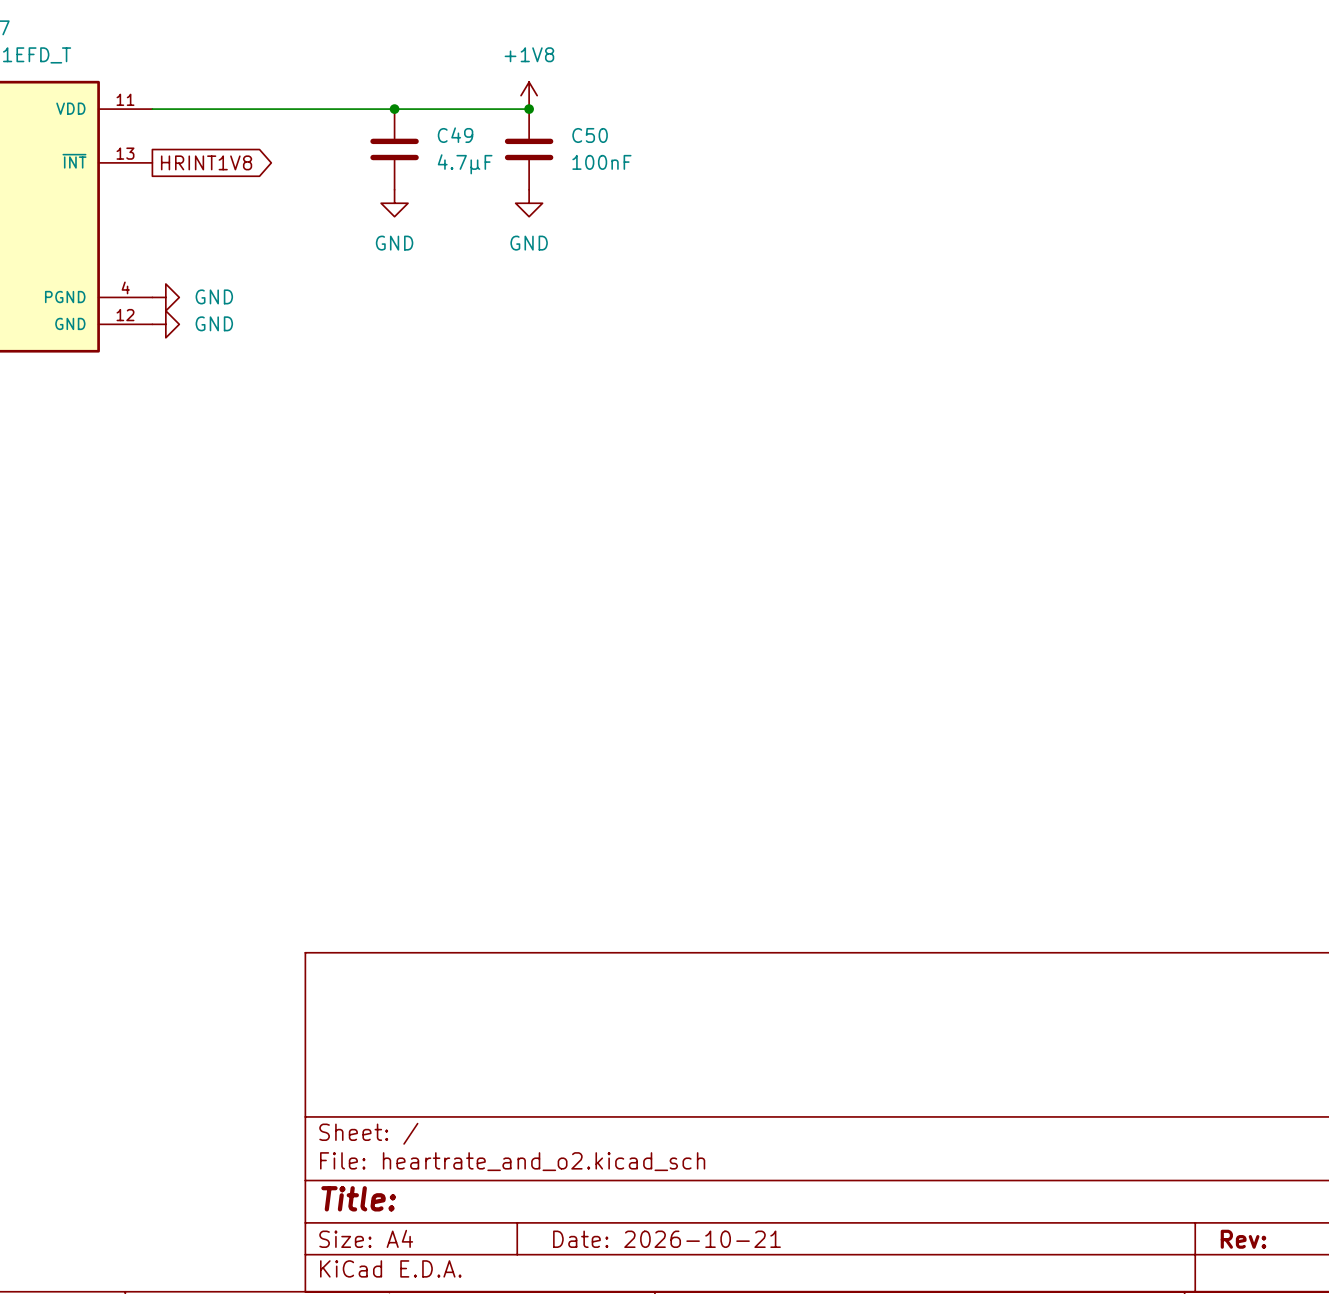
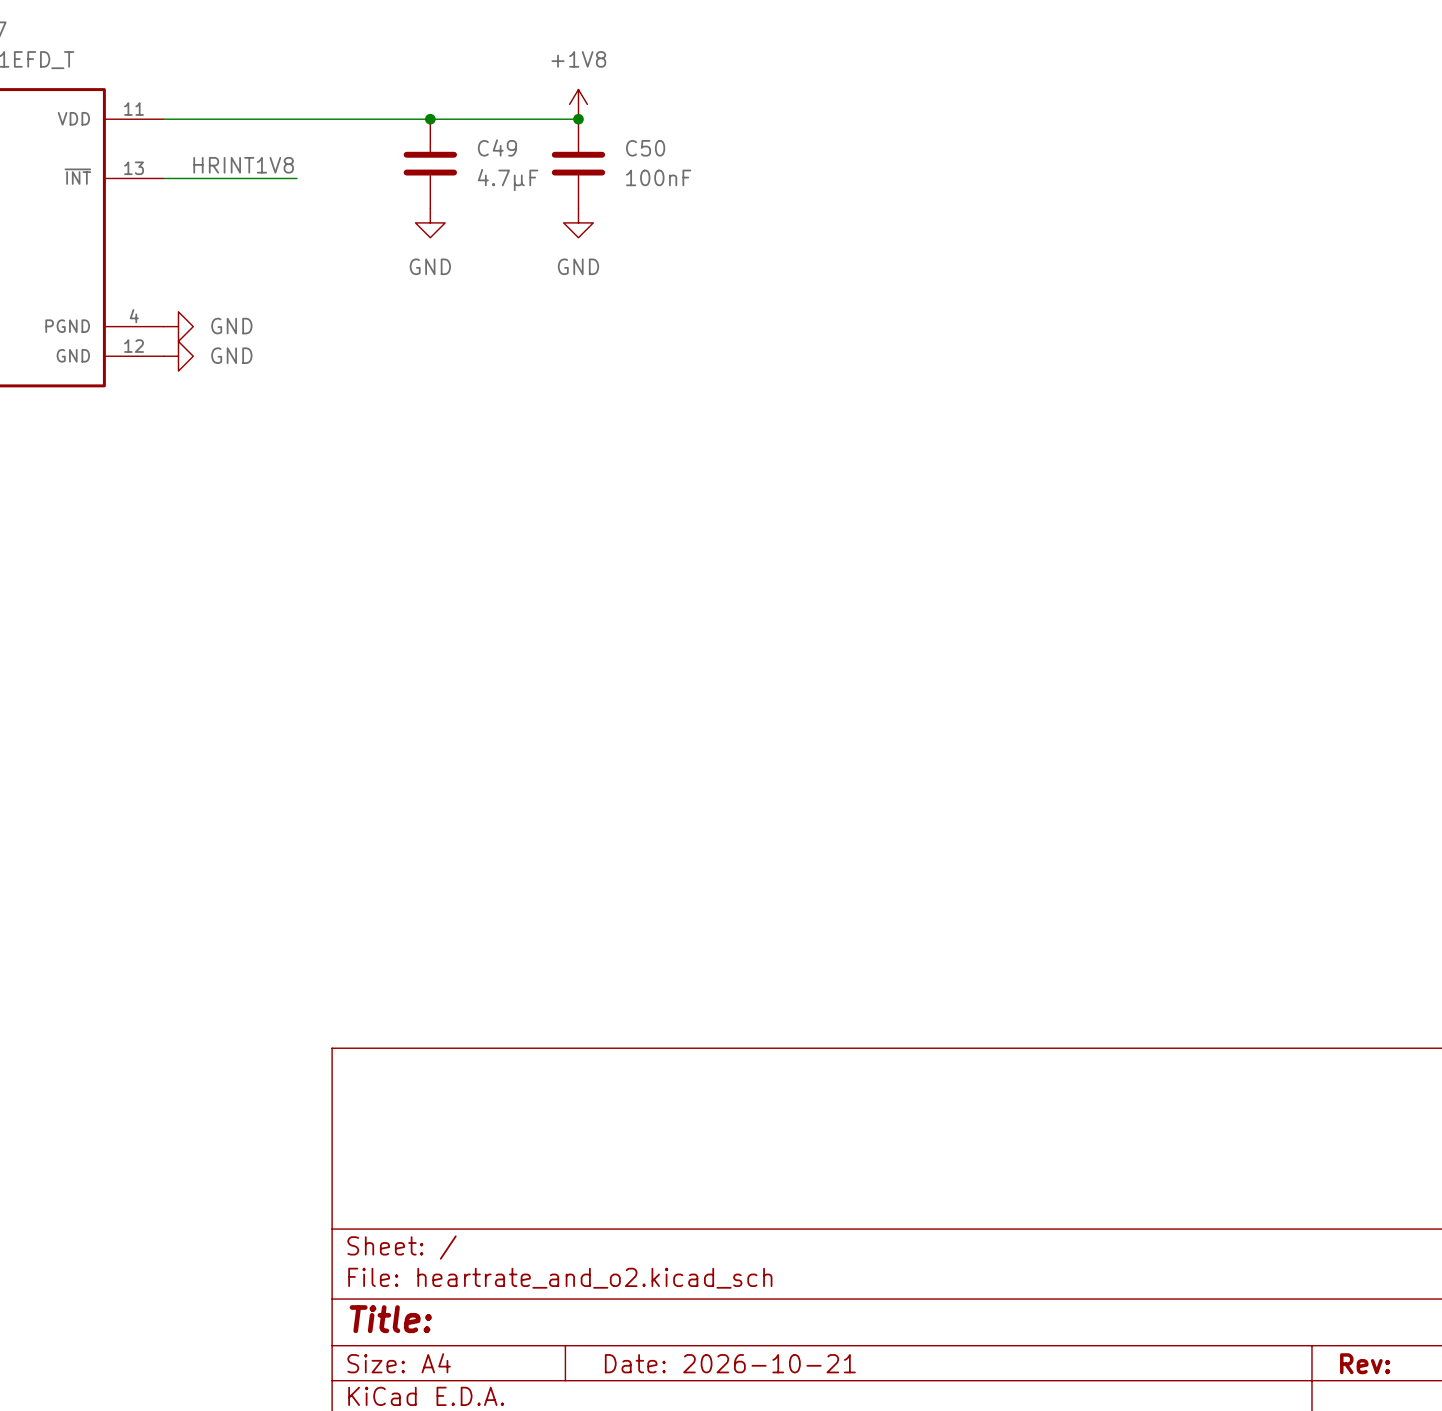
label: none -> HRINT1V8 (243, 165)
wire: none -> (163, 178) (296, 178)
global label: HRINT1V8 (206, 162) -> none

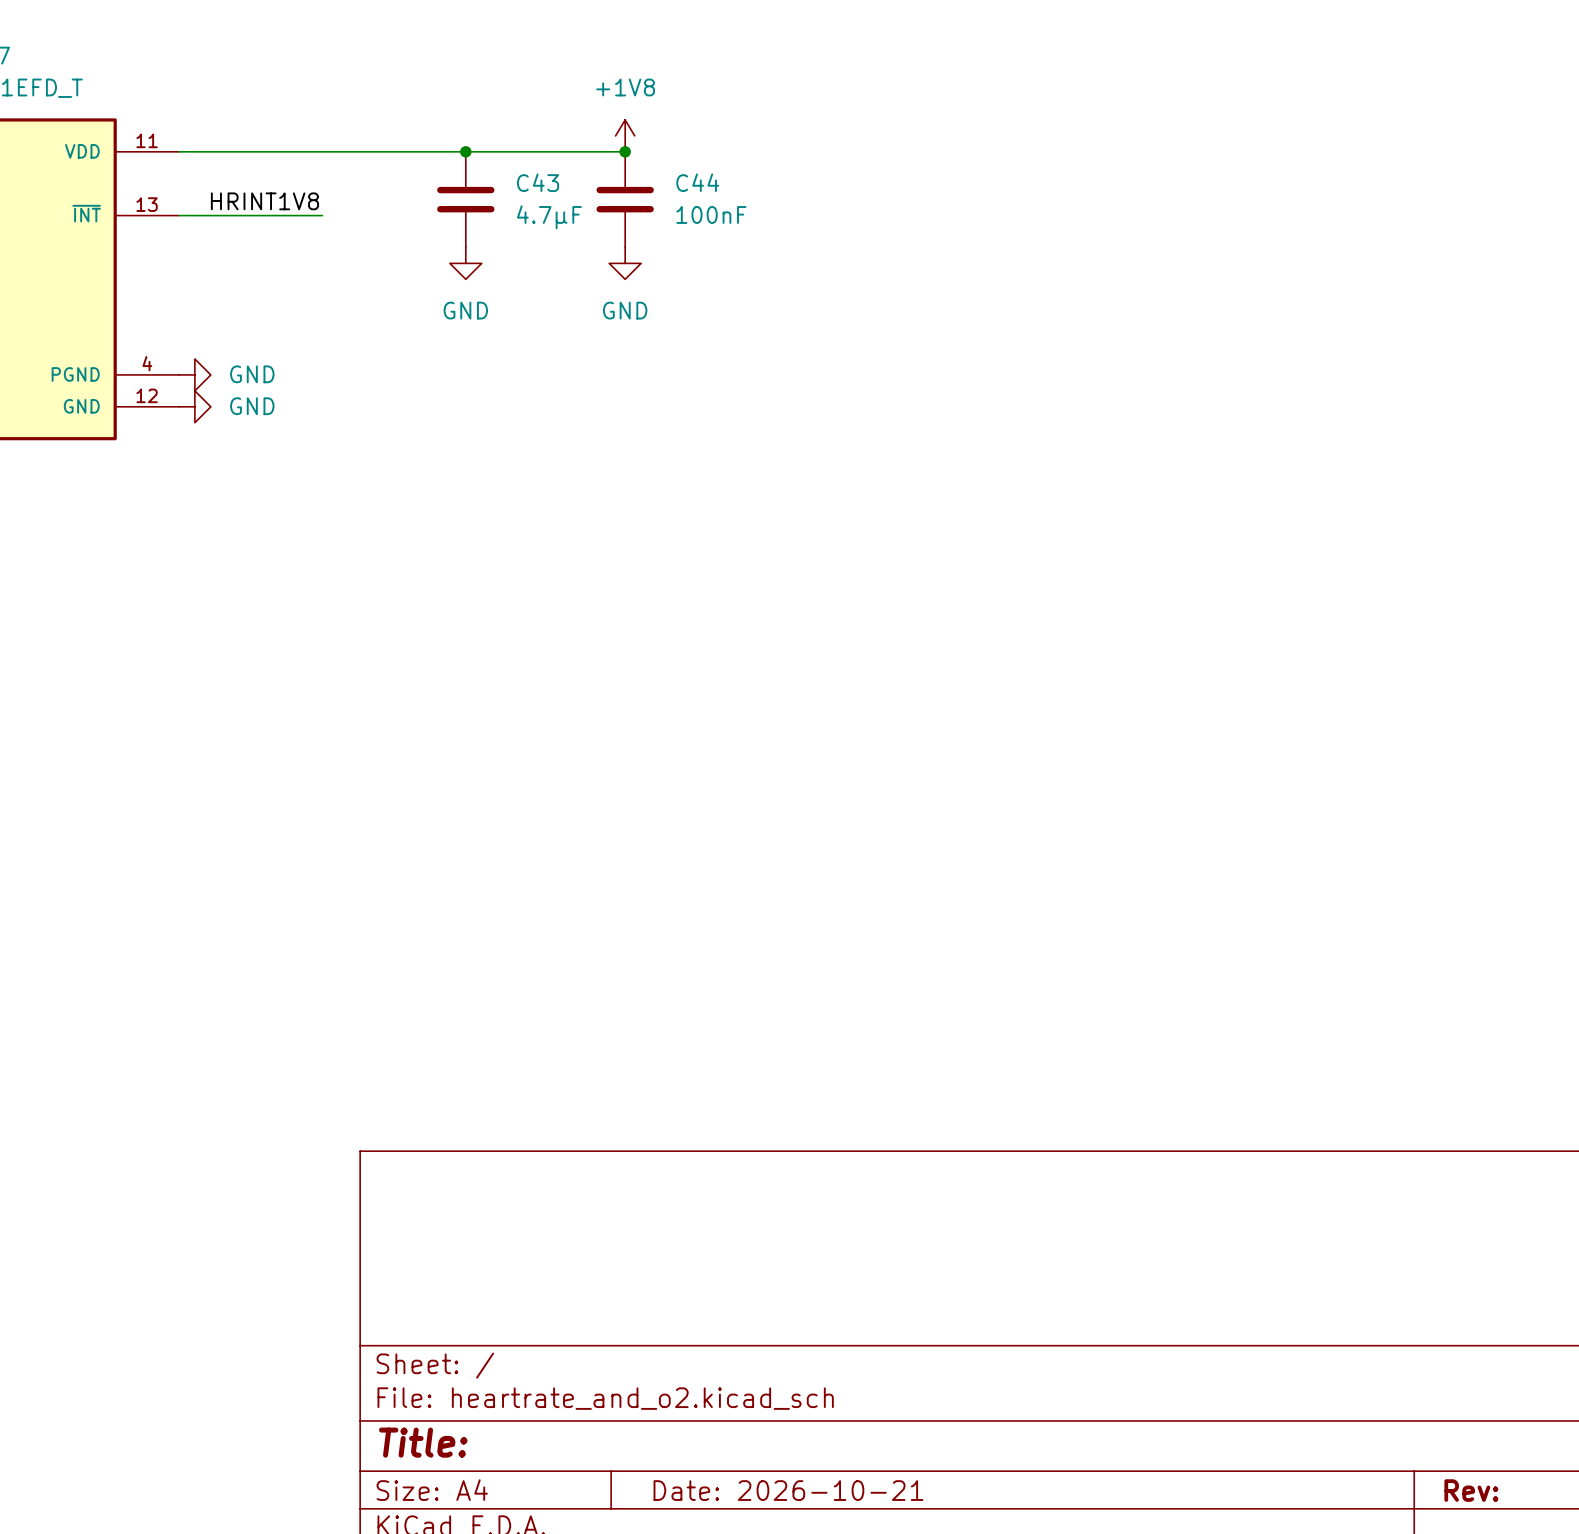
C49 name: C49 (497, 147) -> C43 (538, 182)
C50 name: C50 (645, 148) -> C44 (697, 182)

